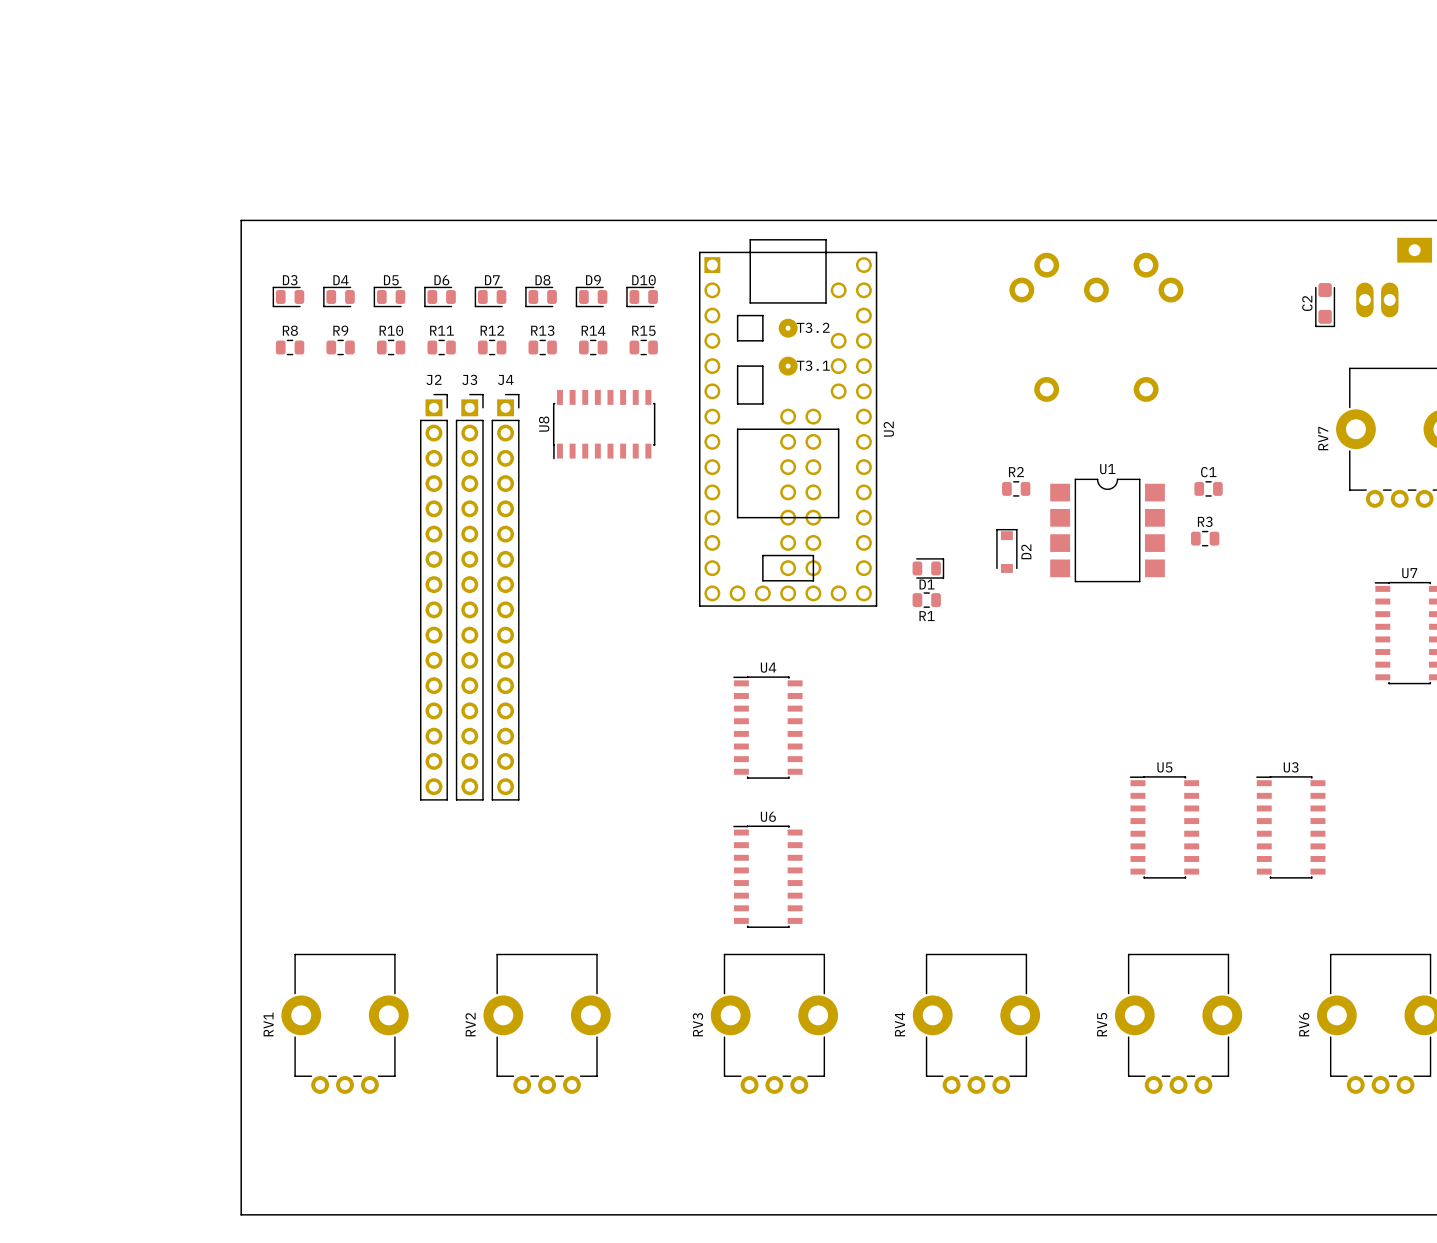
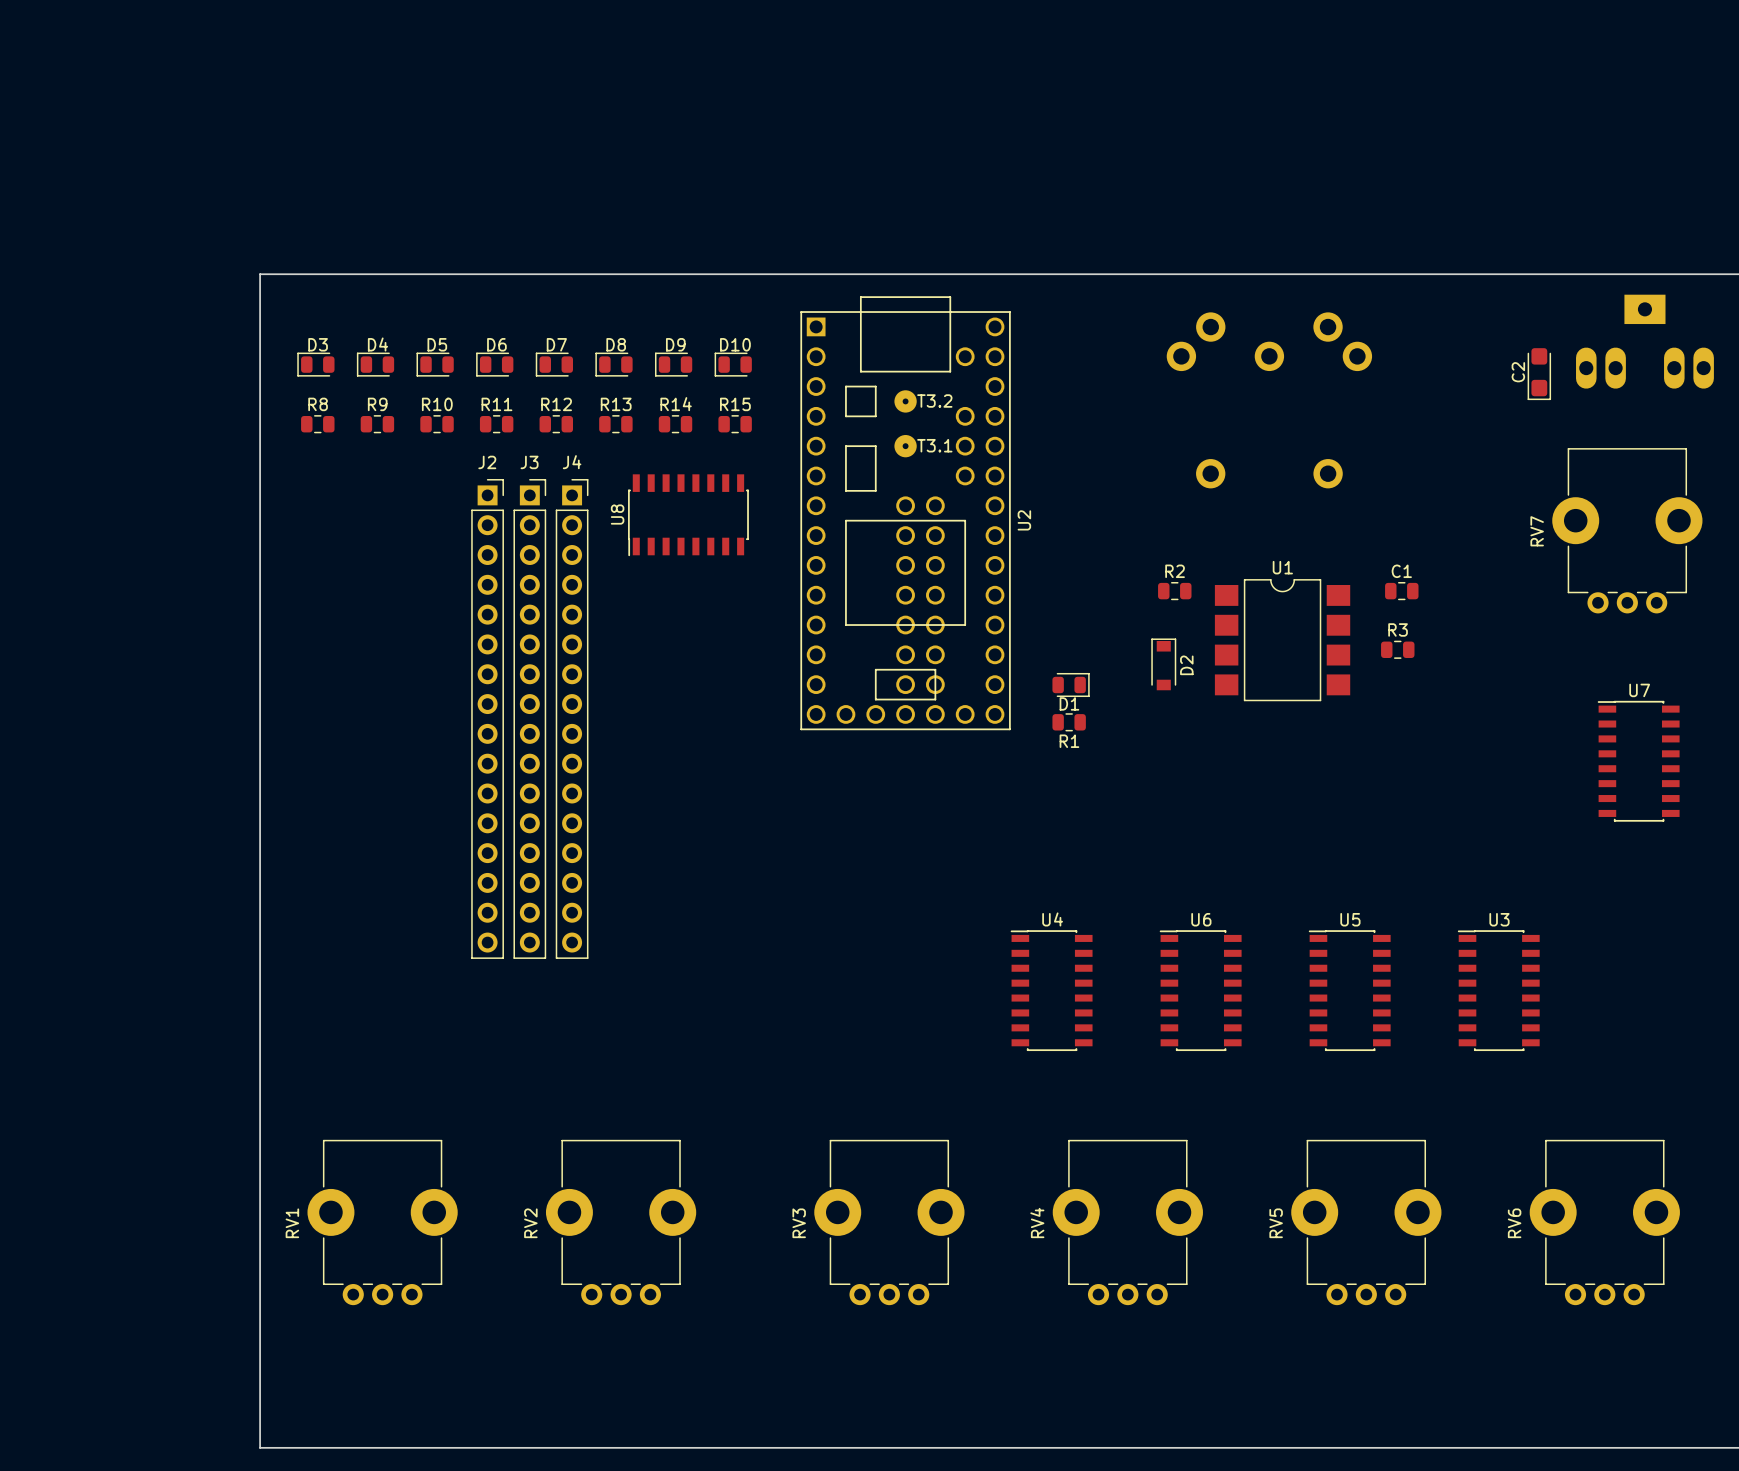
U4 position: (767, 727) -> (1051, 990)
U6 position: (767, 876) -> (1200, 990)

